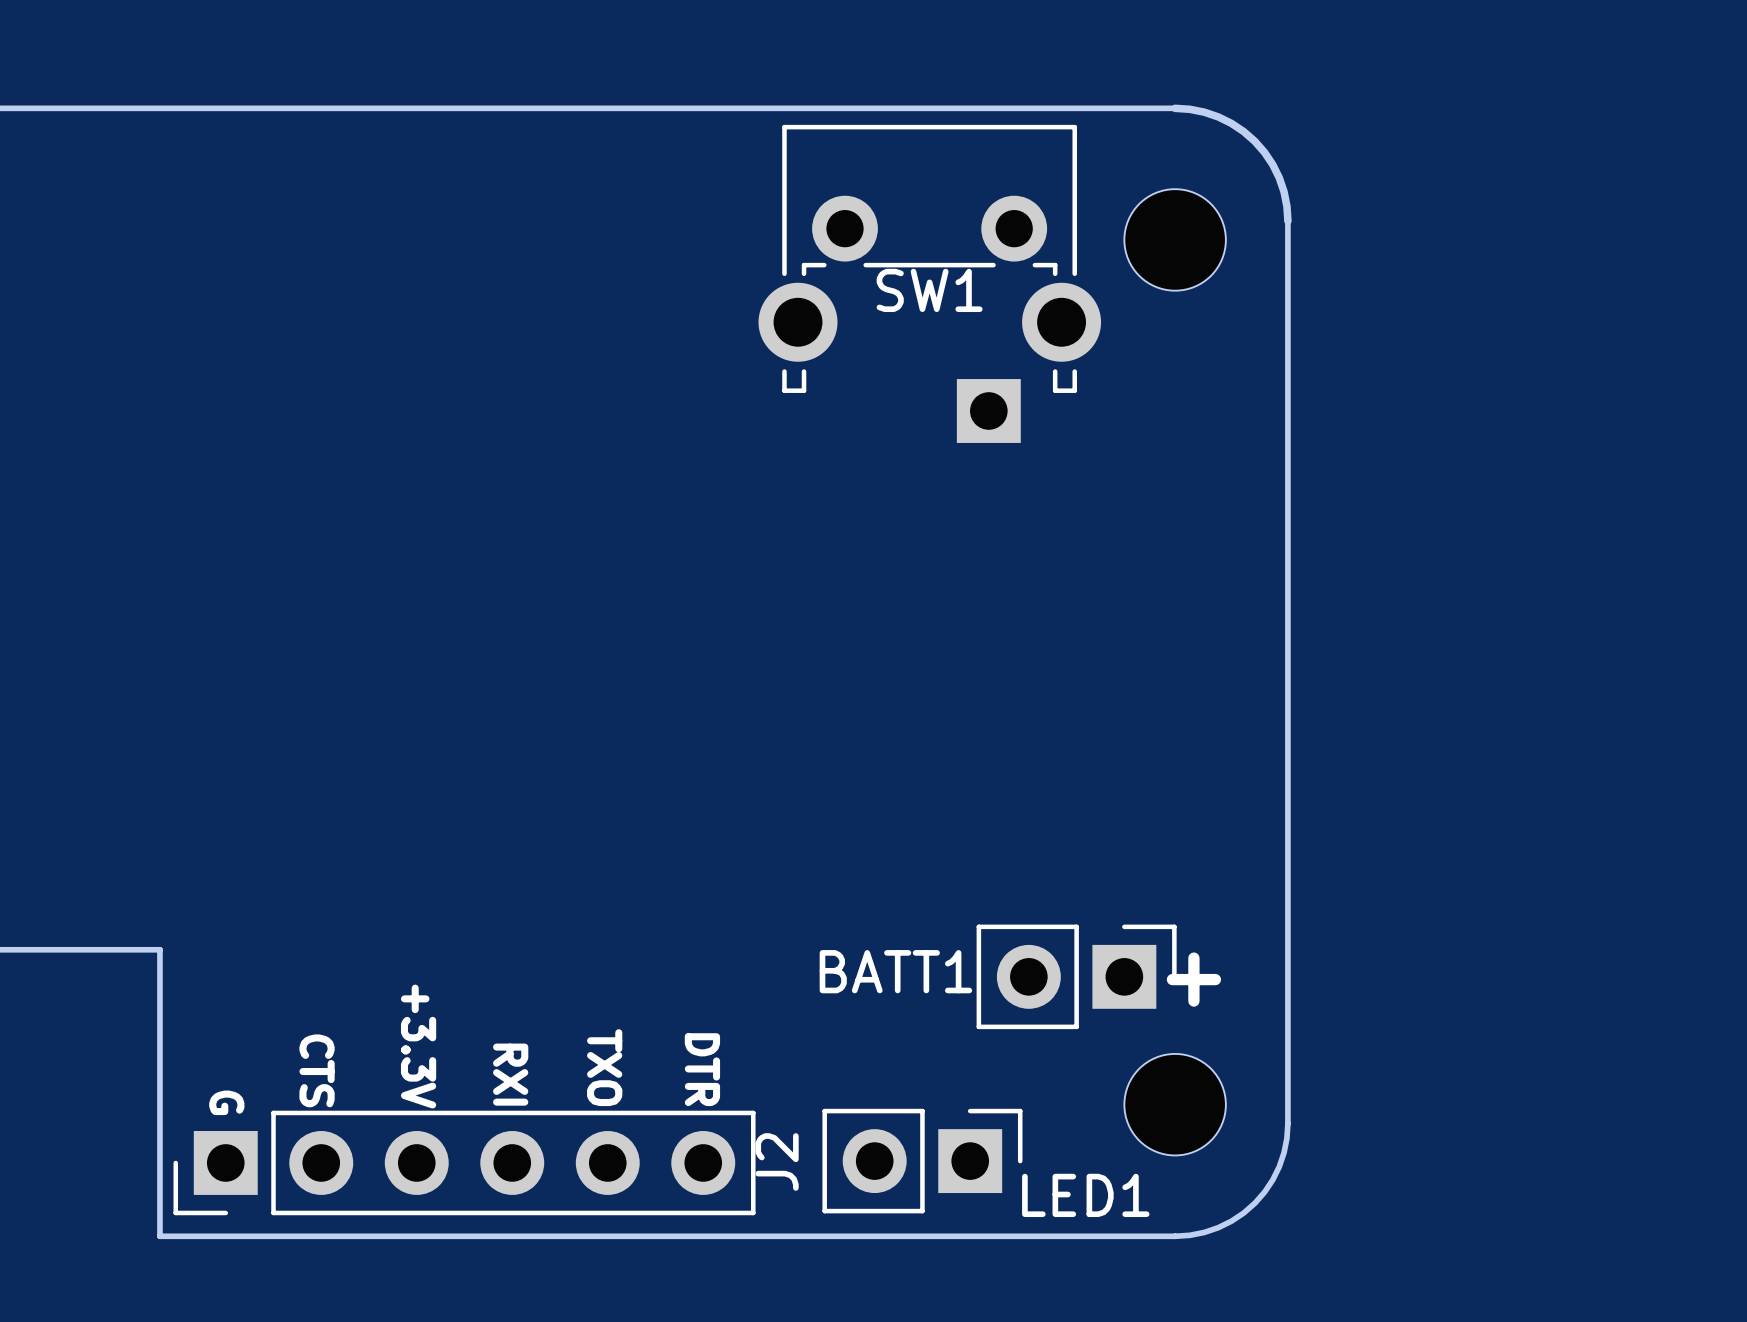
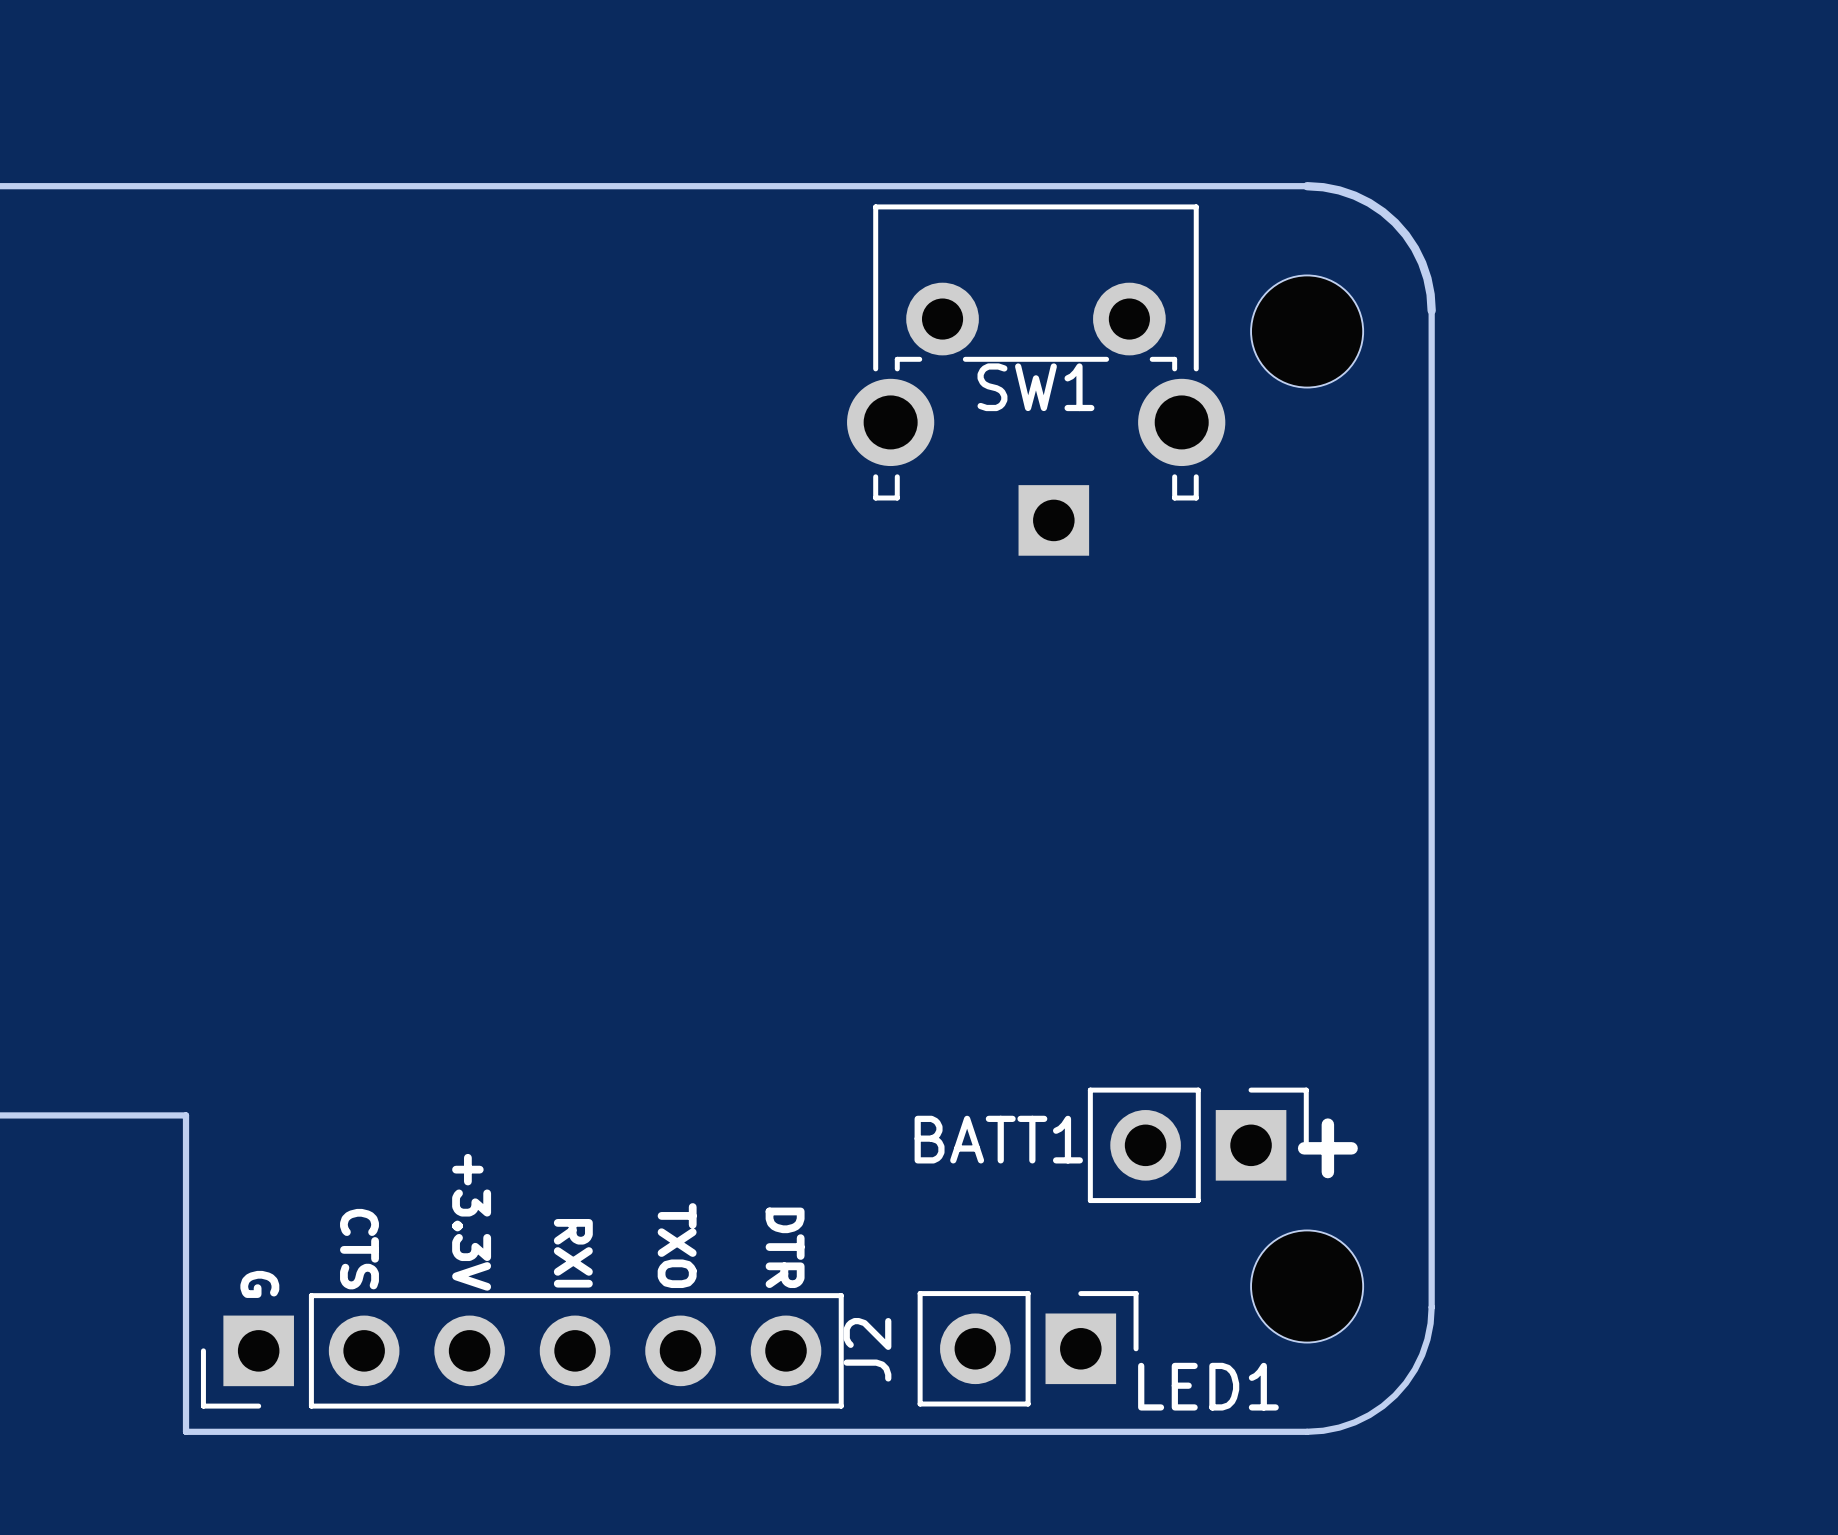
part position: (988, 411) -> (1053, 520)

